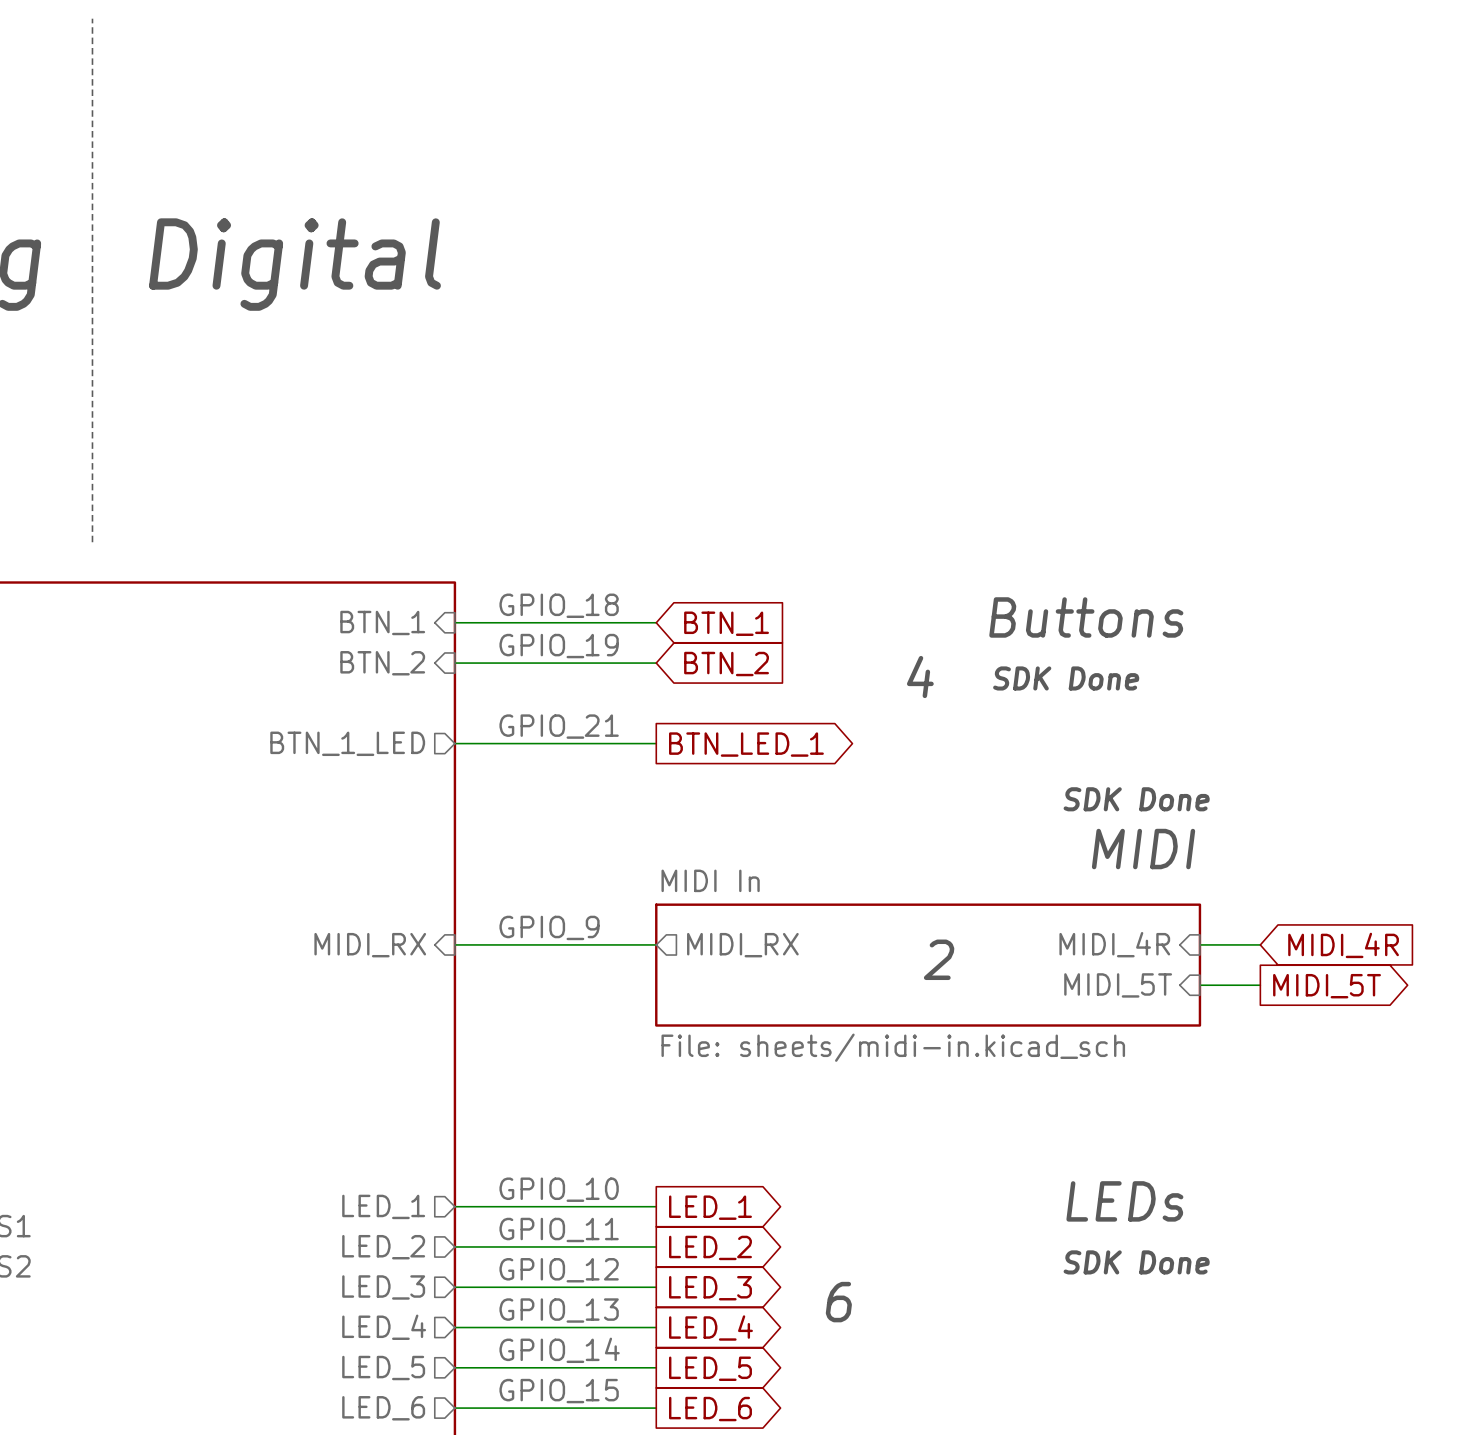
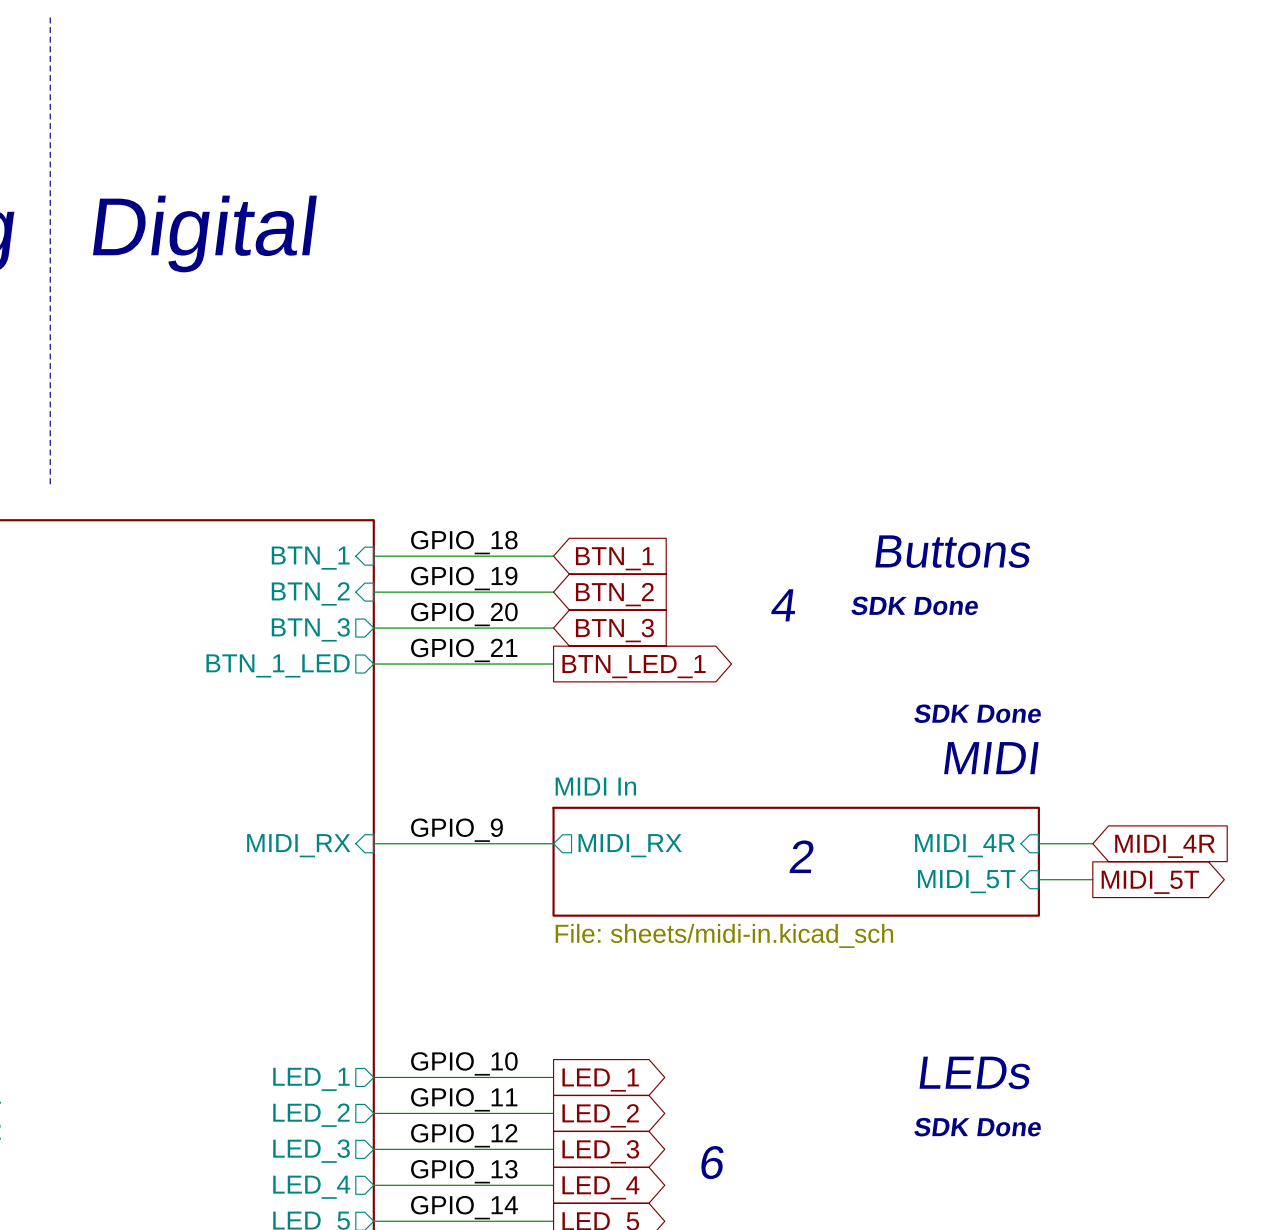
label: none -> GPIO_20 (464, 614)
sheet pin: none -> BTN_3 (310, 629)
wire: none -> (373, 628) (553, 628)
global label: none -> BTN_3 (614, 630)

